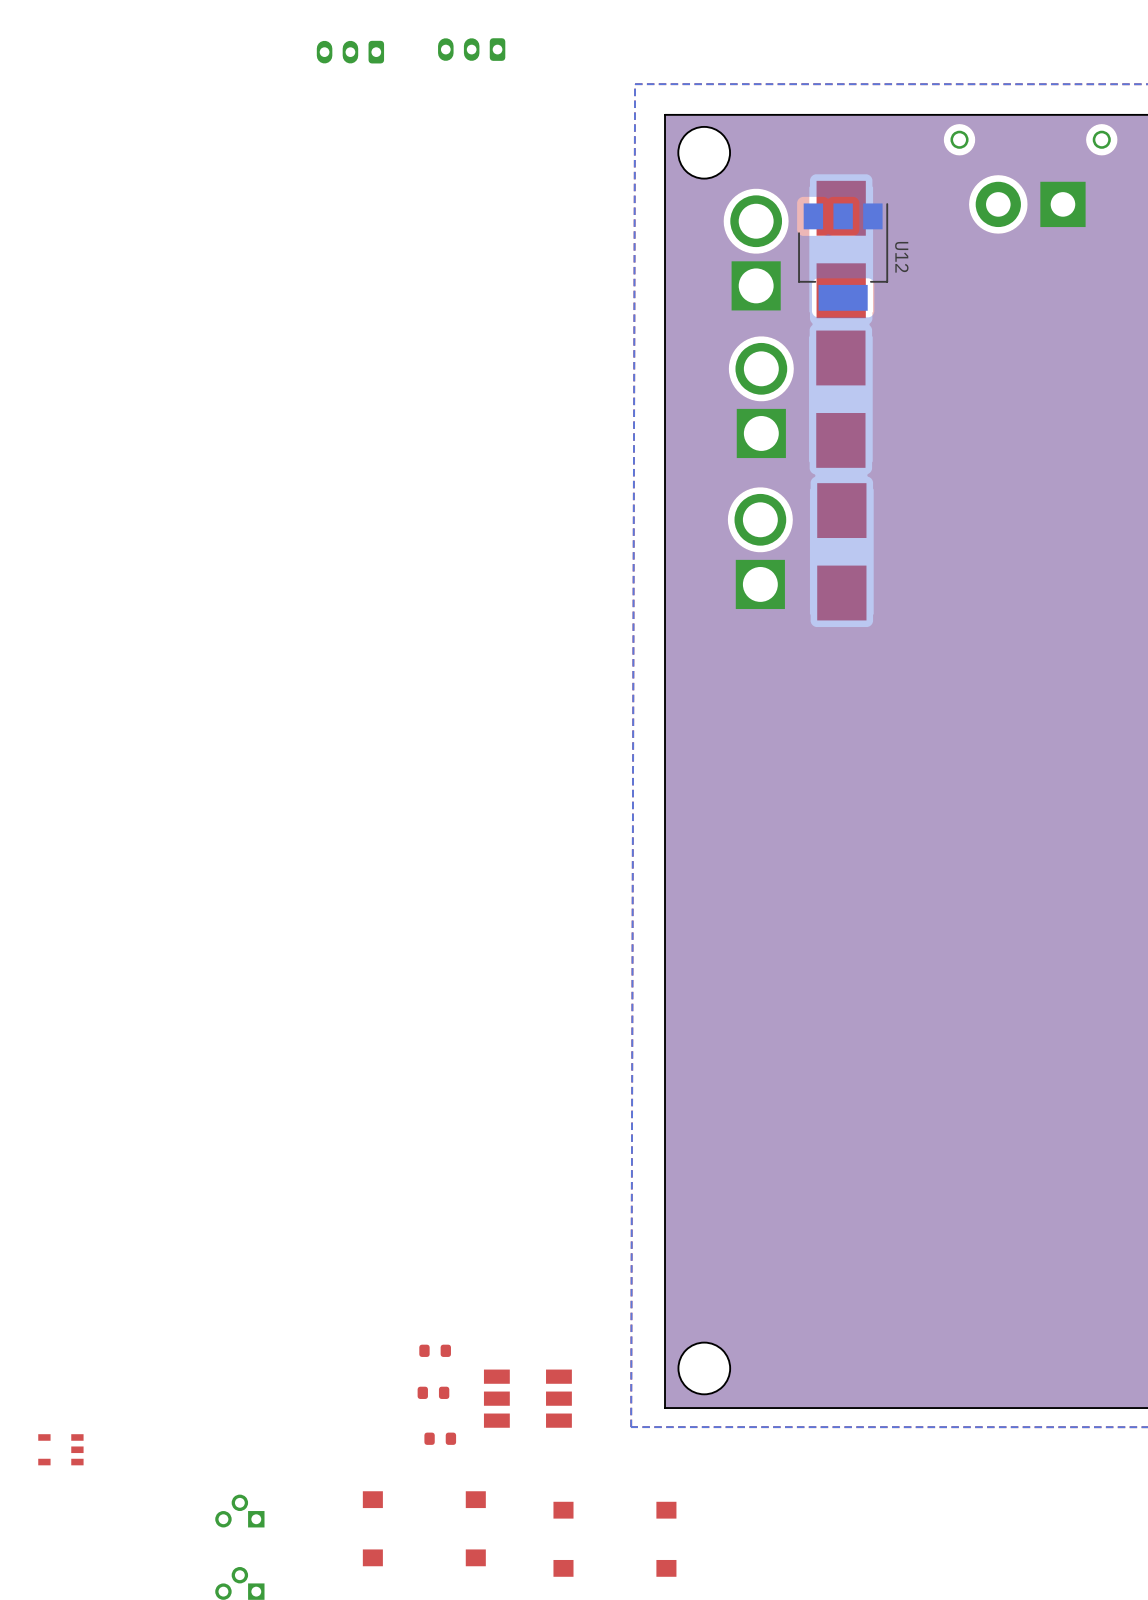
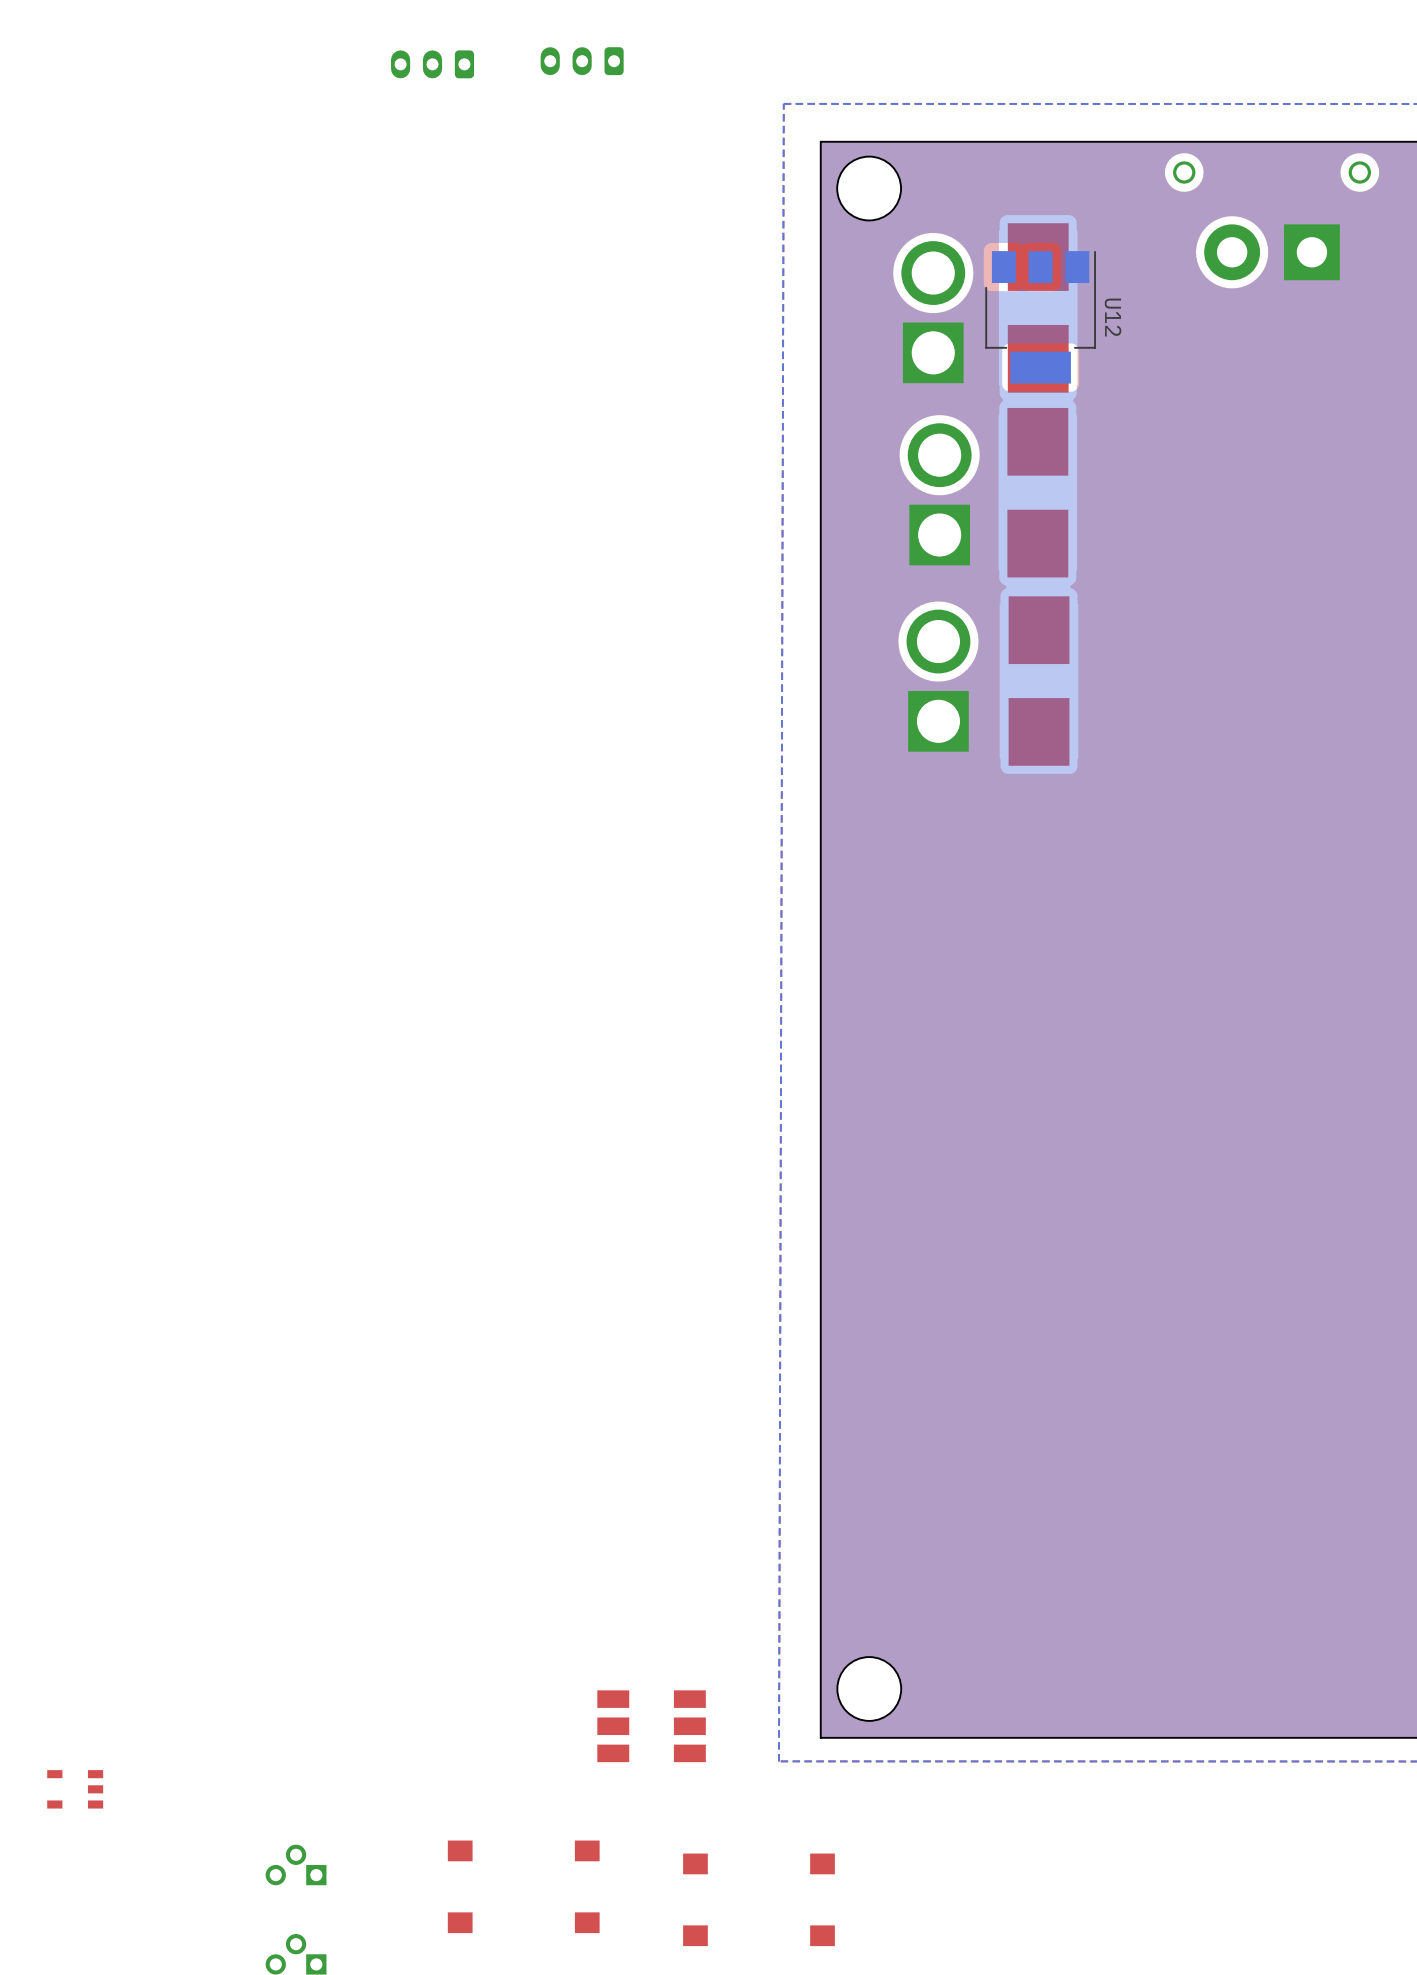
part: (435, 1350) -> none
part: (433, 1392) -> none
part: (440, 1438) -> none

